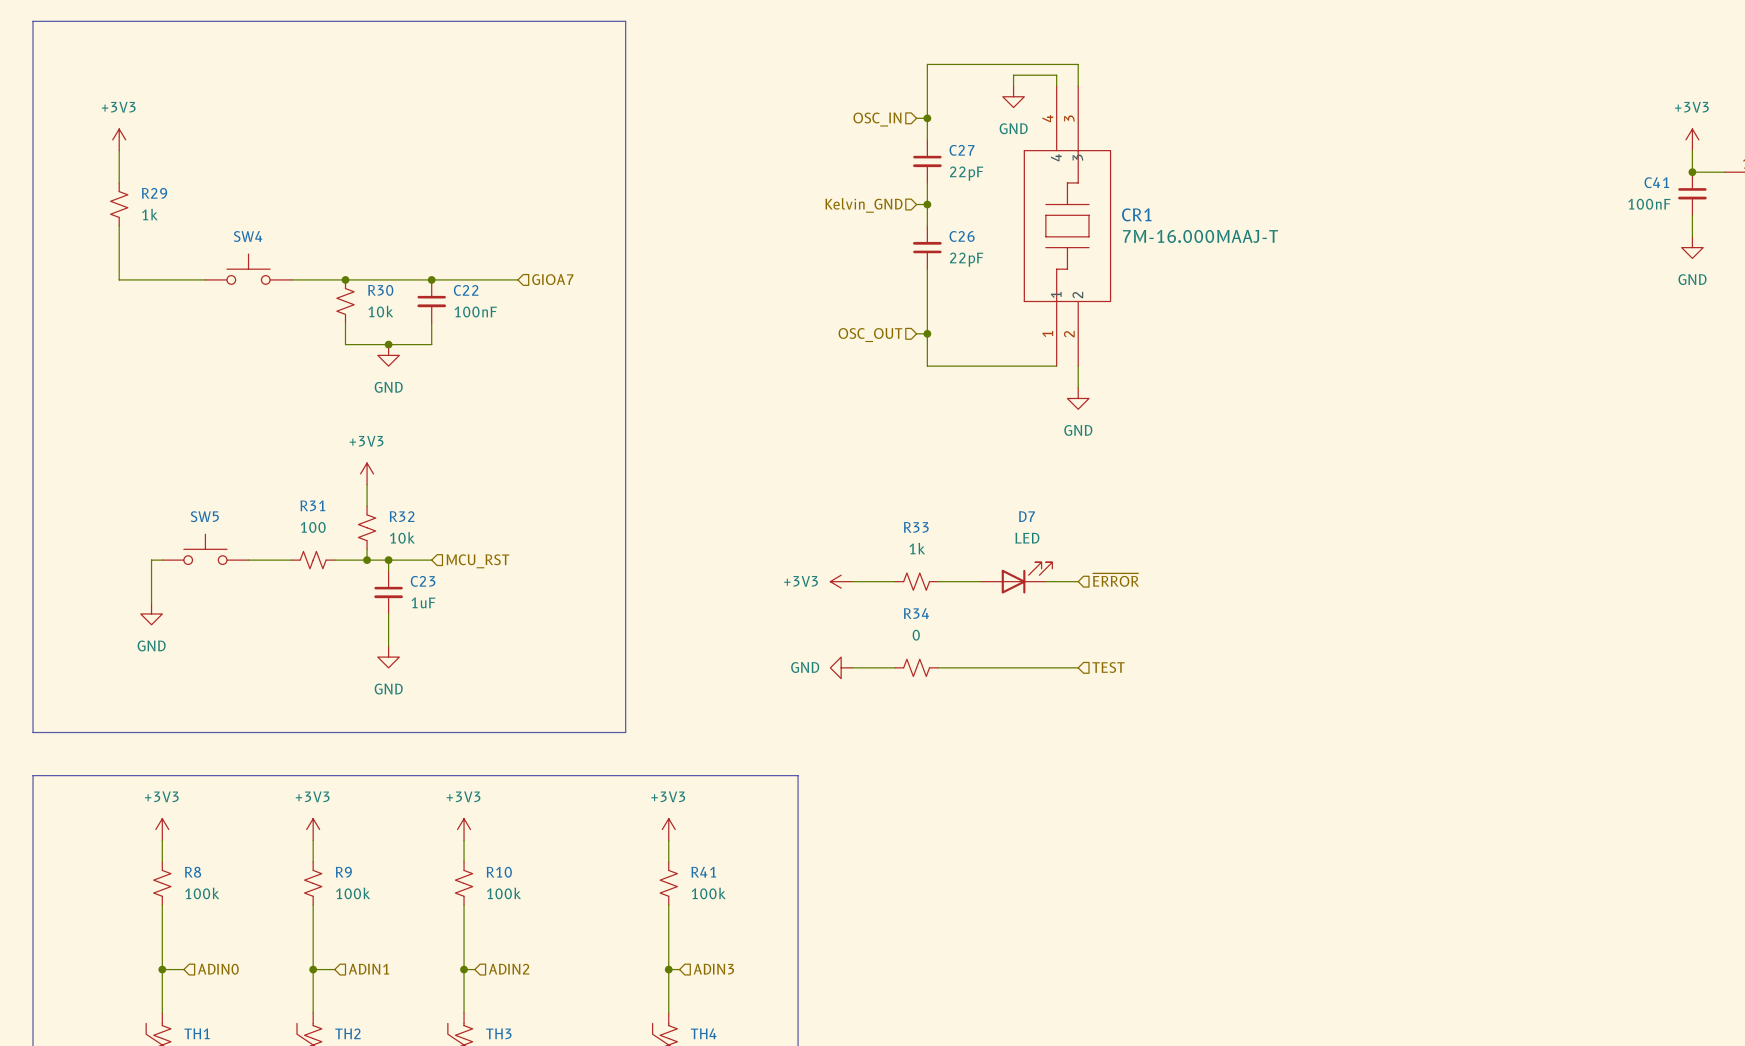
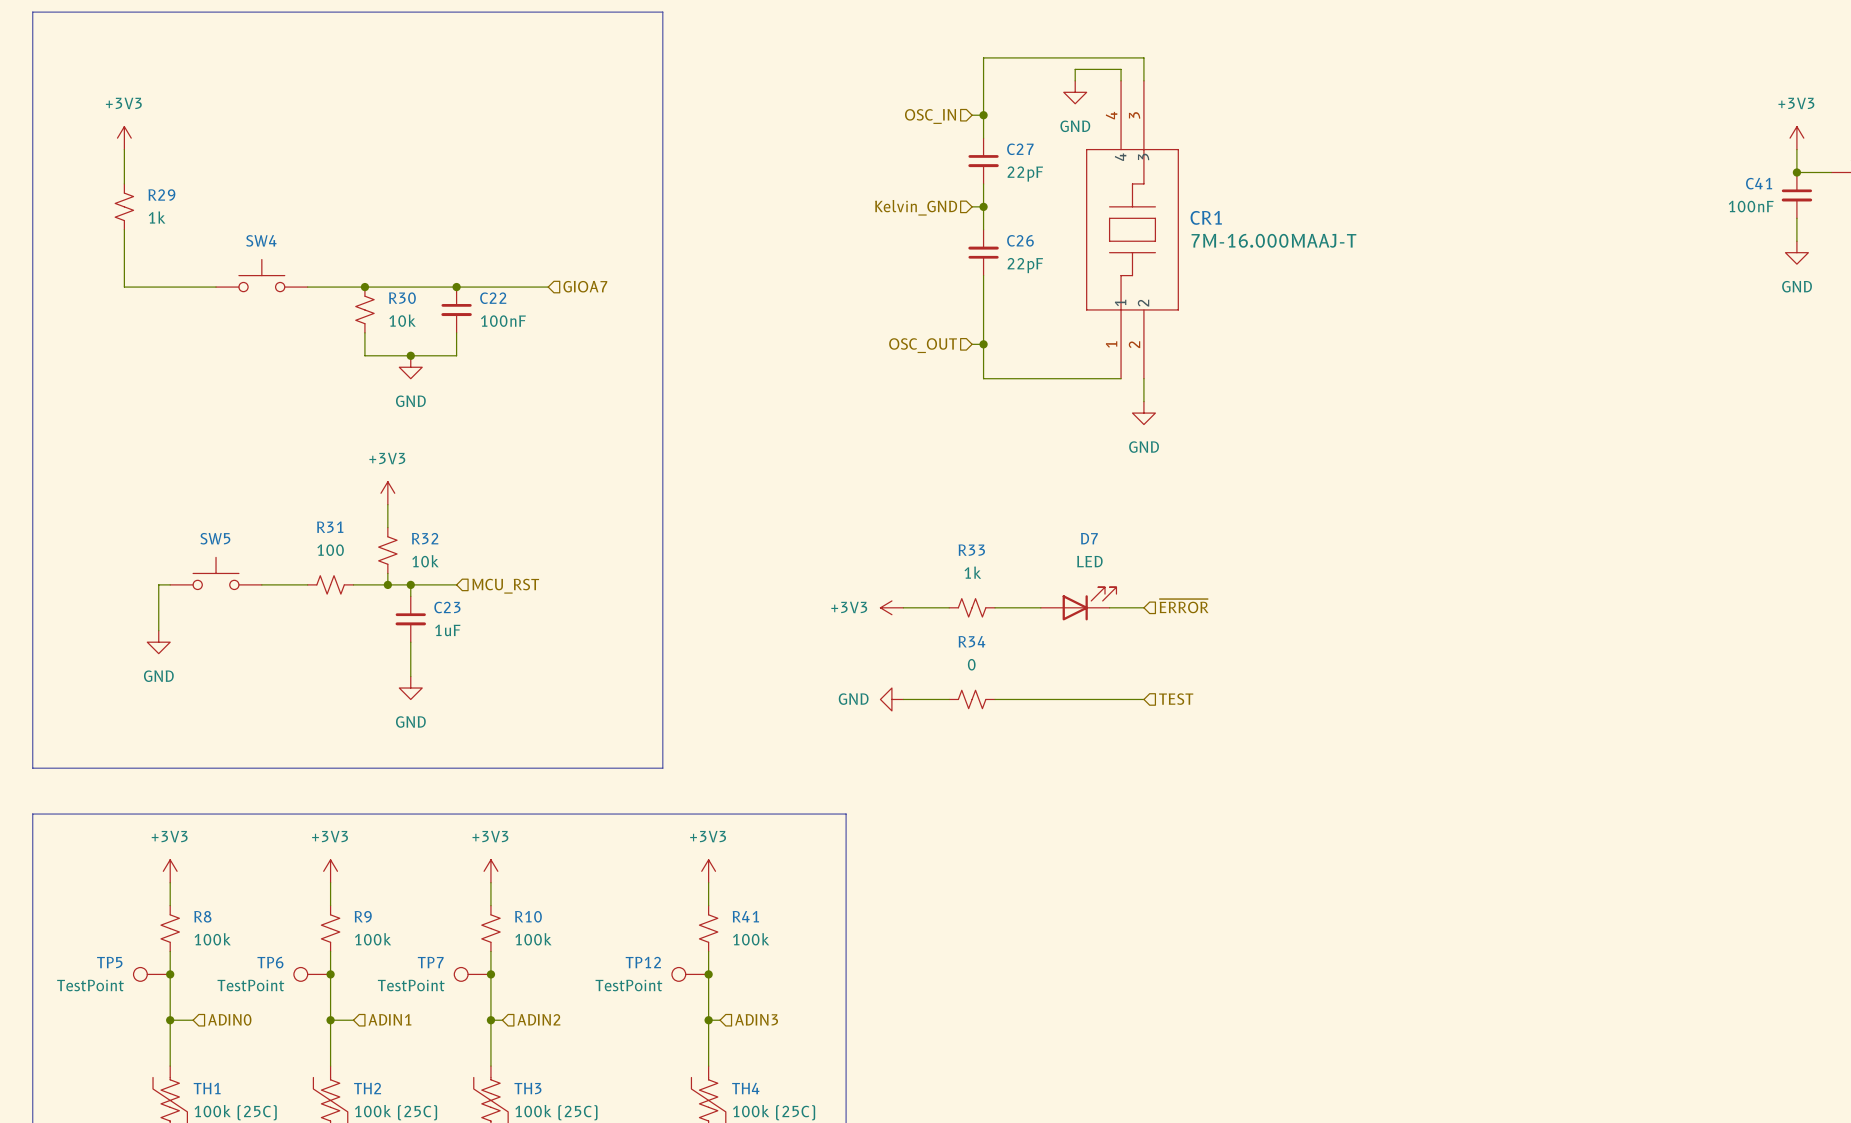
TP5: none -> TestPoint (151, 974)
junction: none -> (170, 974)
TP6: none -> TestPoint (312, 974)
junction: none -> (330, 974)
TP7: none -> TestPoint (472, 974)
junction: none -> (490, 974)
TP12: none -> TestPoint (690, 974)
junction: none -> (708, 974)

